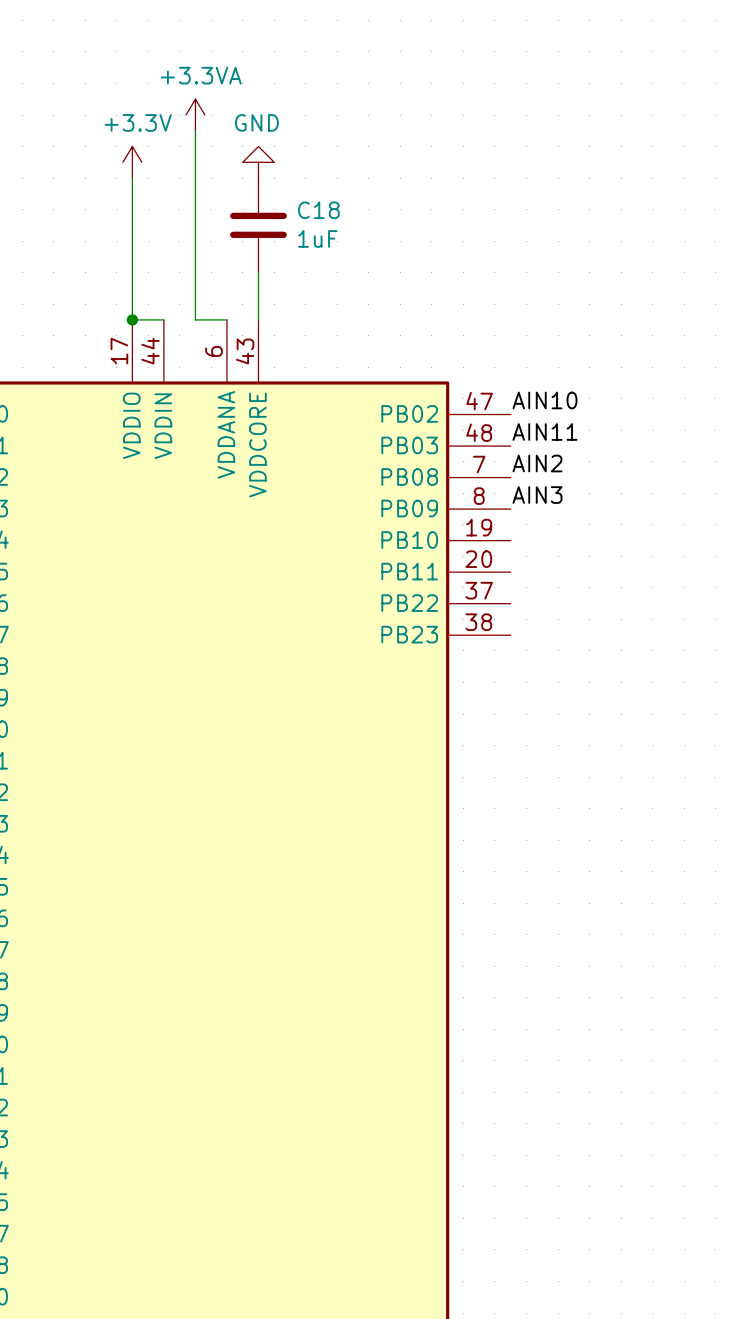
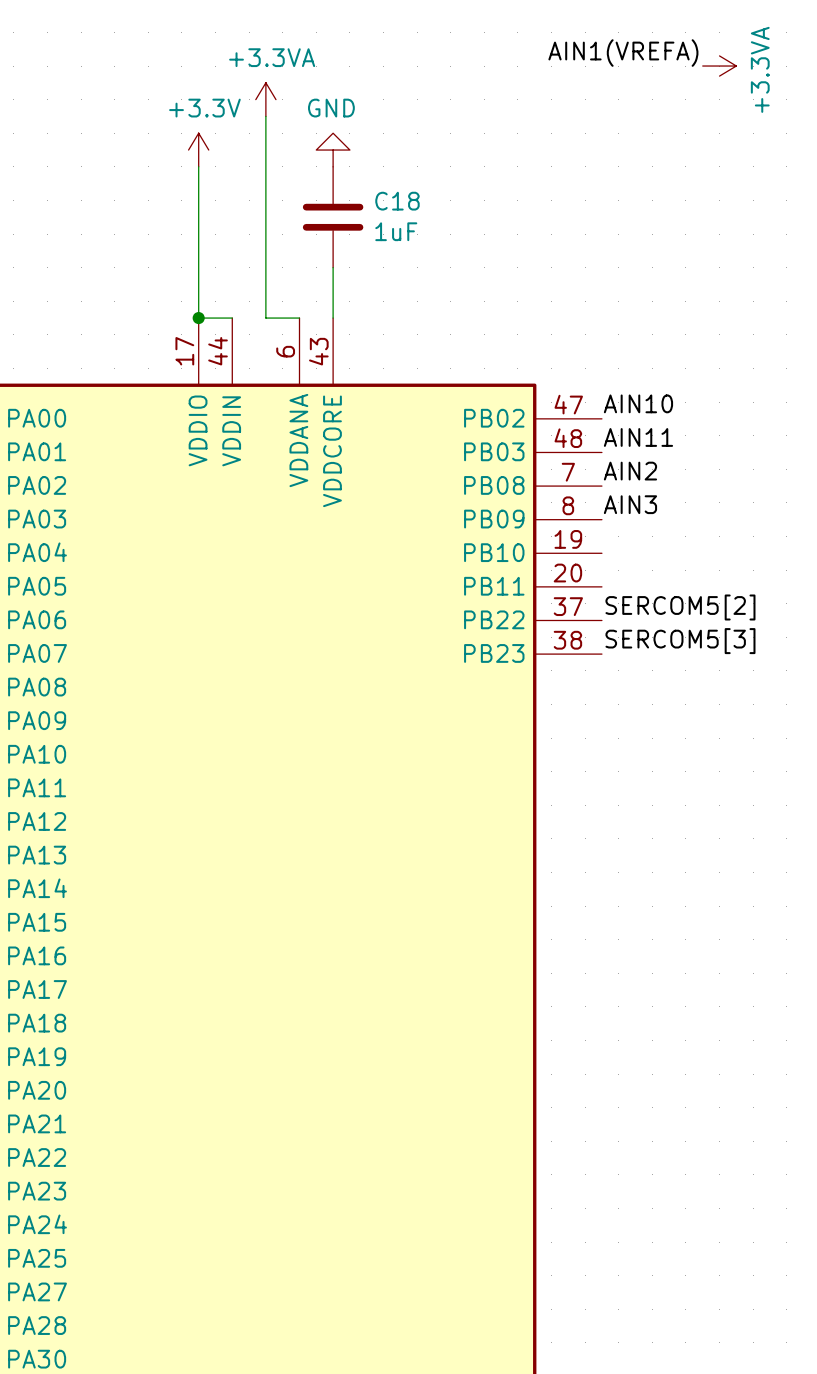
label: none -> AIN1(VREFA) (623, 53)
power symbol: none -> +3.3VA (719, 66)
label: none -> SERCOM5[2] (680, 607)
label: none -> SERCOM5[3] (680, 641)

